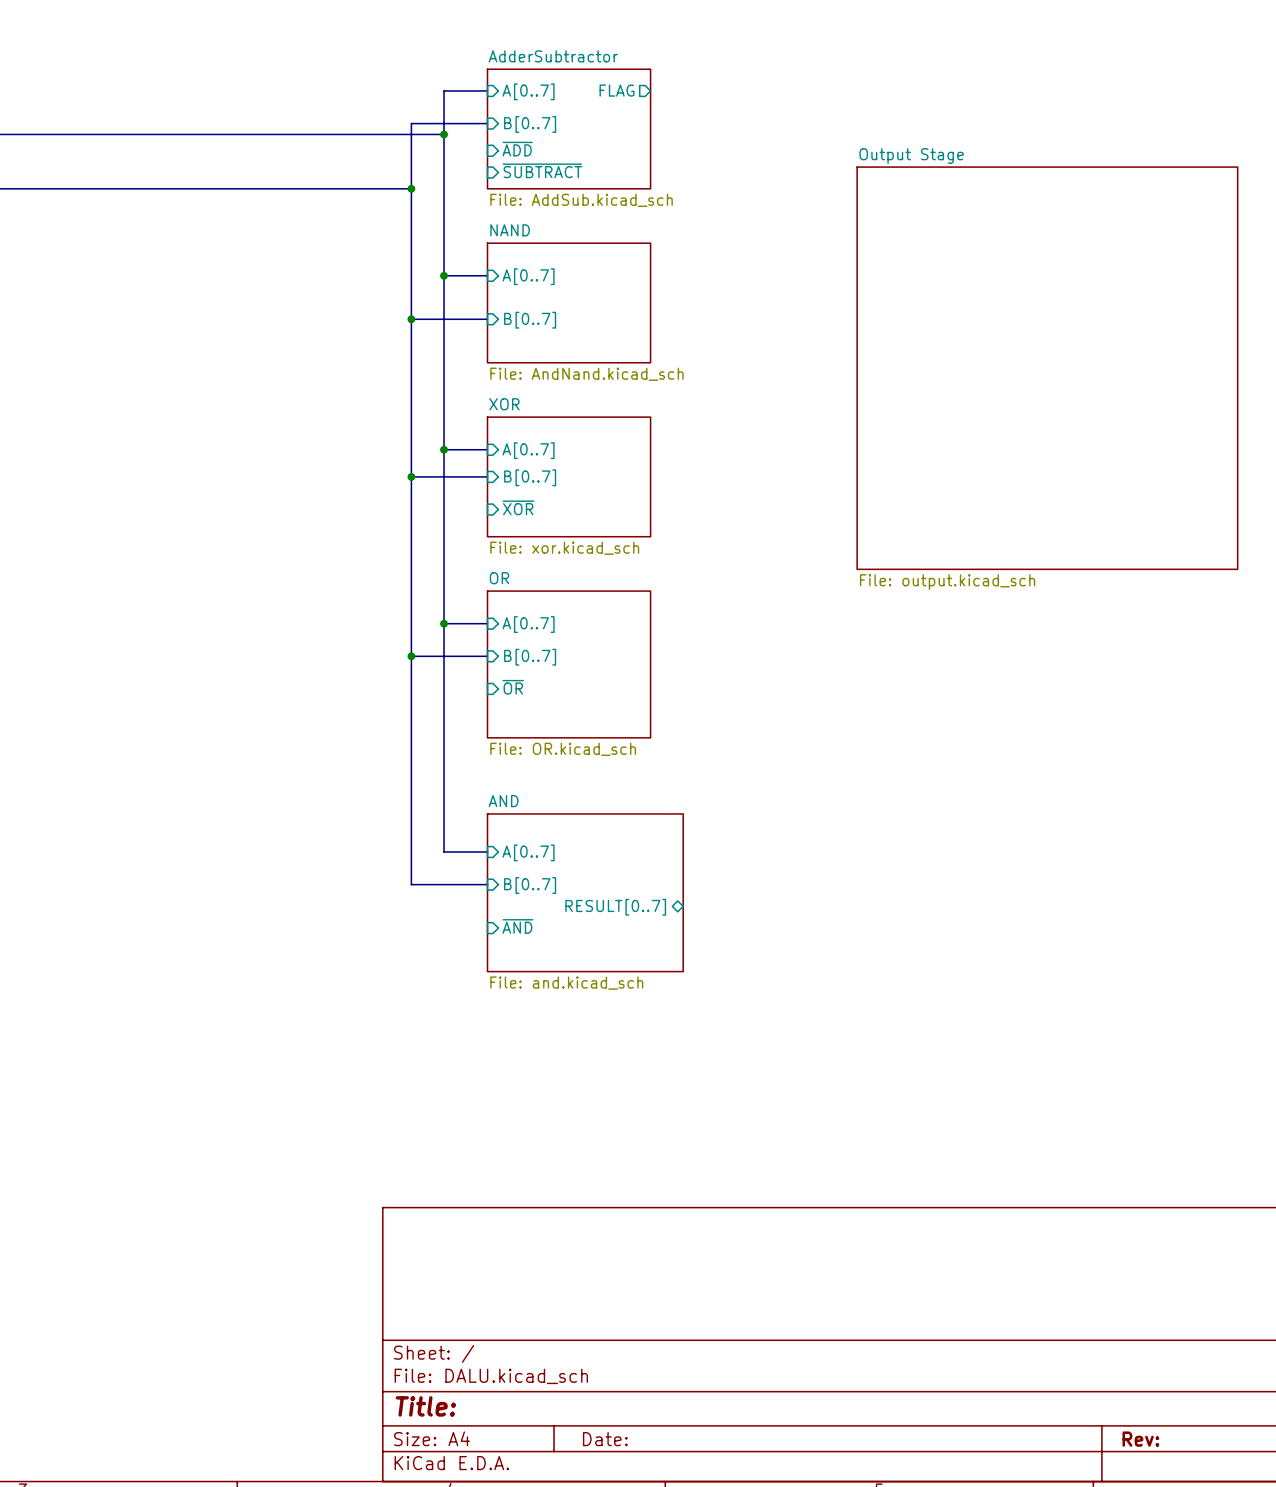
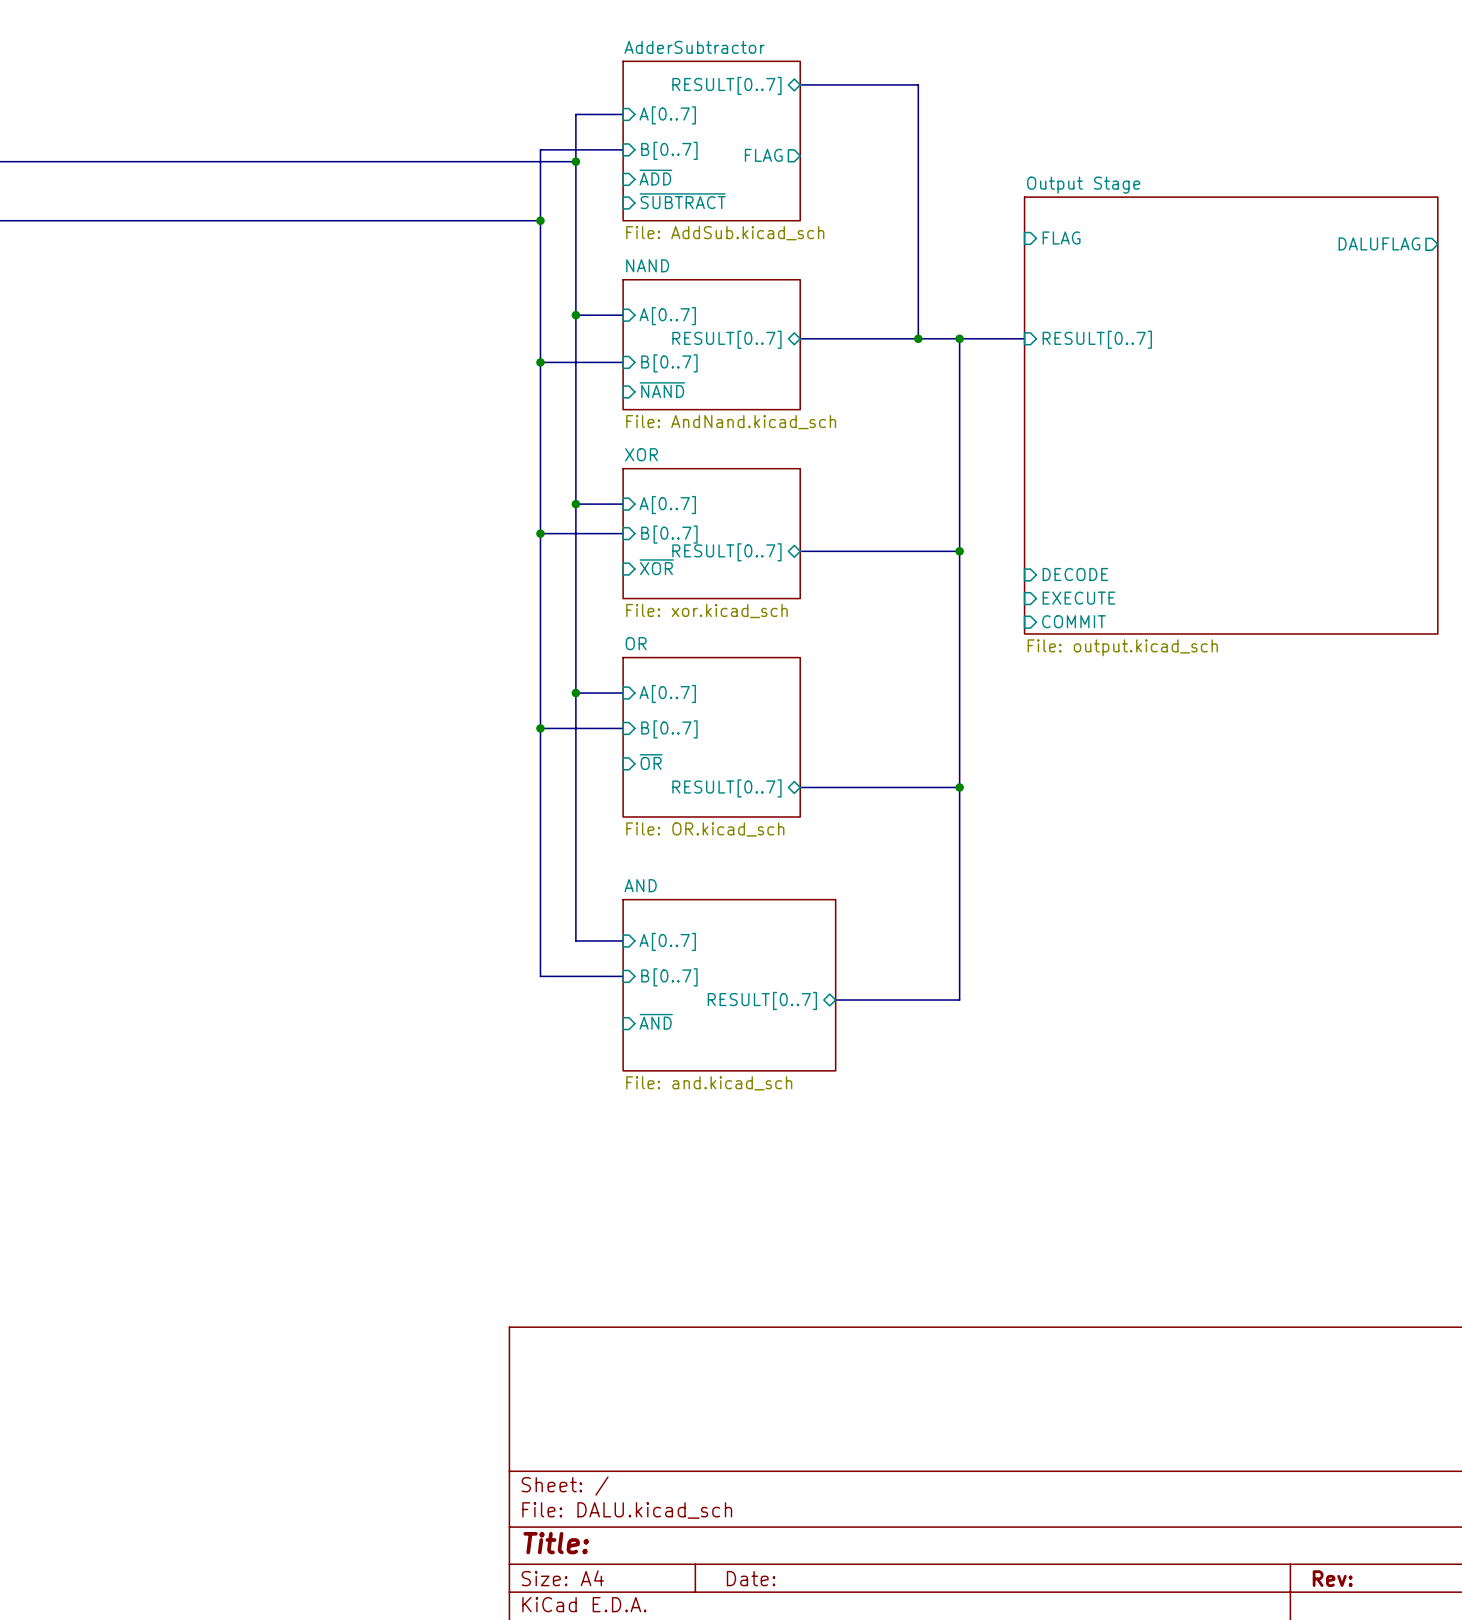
bus: none -> (800, 84) (918, 84) (918, 338)
sheet pin: none -> RESULT[0..7] (726, 85)
sheet pin position: FLAG (617, 90) -> FLAG (763, 155)
sheet AdderSubtractor: none -> File: AddSub.kicad_sch (711, 141)
sheet AdderSubtractor: File: AddSub.kicad_sch (569, 129) -> none
sheet pin: none -> FLAG (1061, 237)
sheet pin: none -> DALUFLAG (1379, 243)
bus: none -> (800, 338) (1024, 338)
junction: none -> (918, 338)
bus: none -> (959, 338) (959, 1000) (835, 1000)
junction: none -> (959, 338)
sheet pin: none -> RESULT[0..7] (726, 339)
sheet pin: none -> RESULT[0..7] (1097, 339)
sheet pin: none -> ~{NAND} (662, 390)
bus: none -> (800, 551) (959, 551)
junction: none -> (959, 551)
sheet pin: none -> RESULT[0..7] (726, 552)
sheet pin: none -> DECODE (1075, 574)
sheet pin: none -> EXECUTE (1079, 598)
sheet pin: none -> COMMIT (1073, 621)
bus: none -> (800, 787) (959, 787)
junction: none -> (959, 787)
sheet pin: none -> RESULT[0..7] (726, 788)

